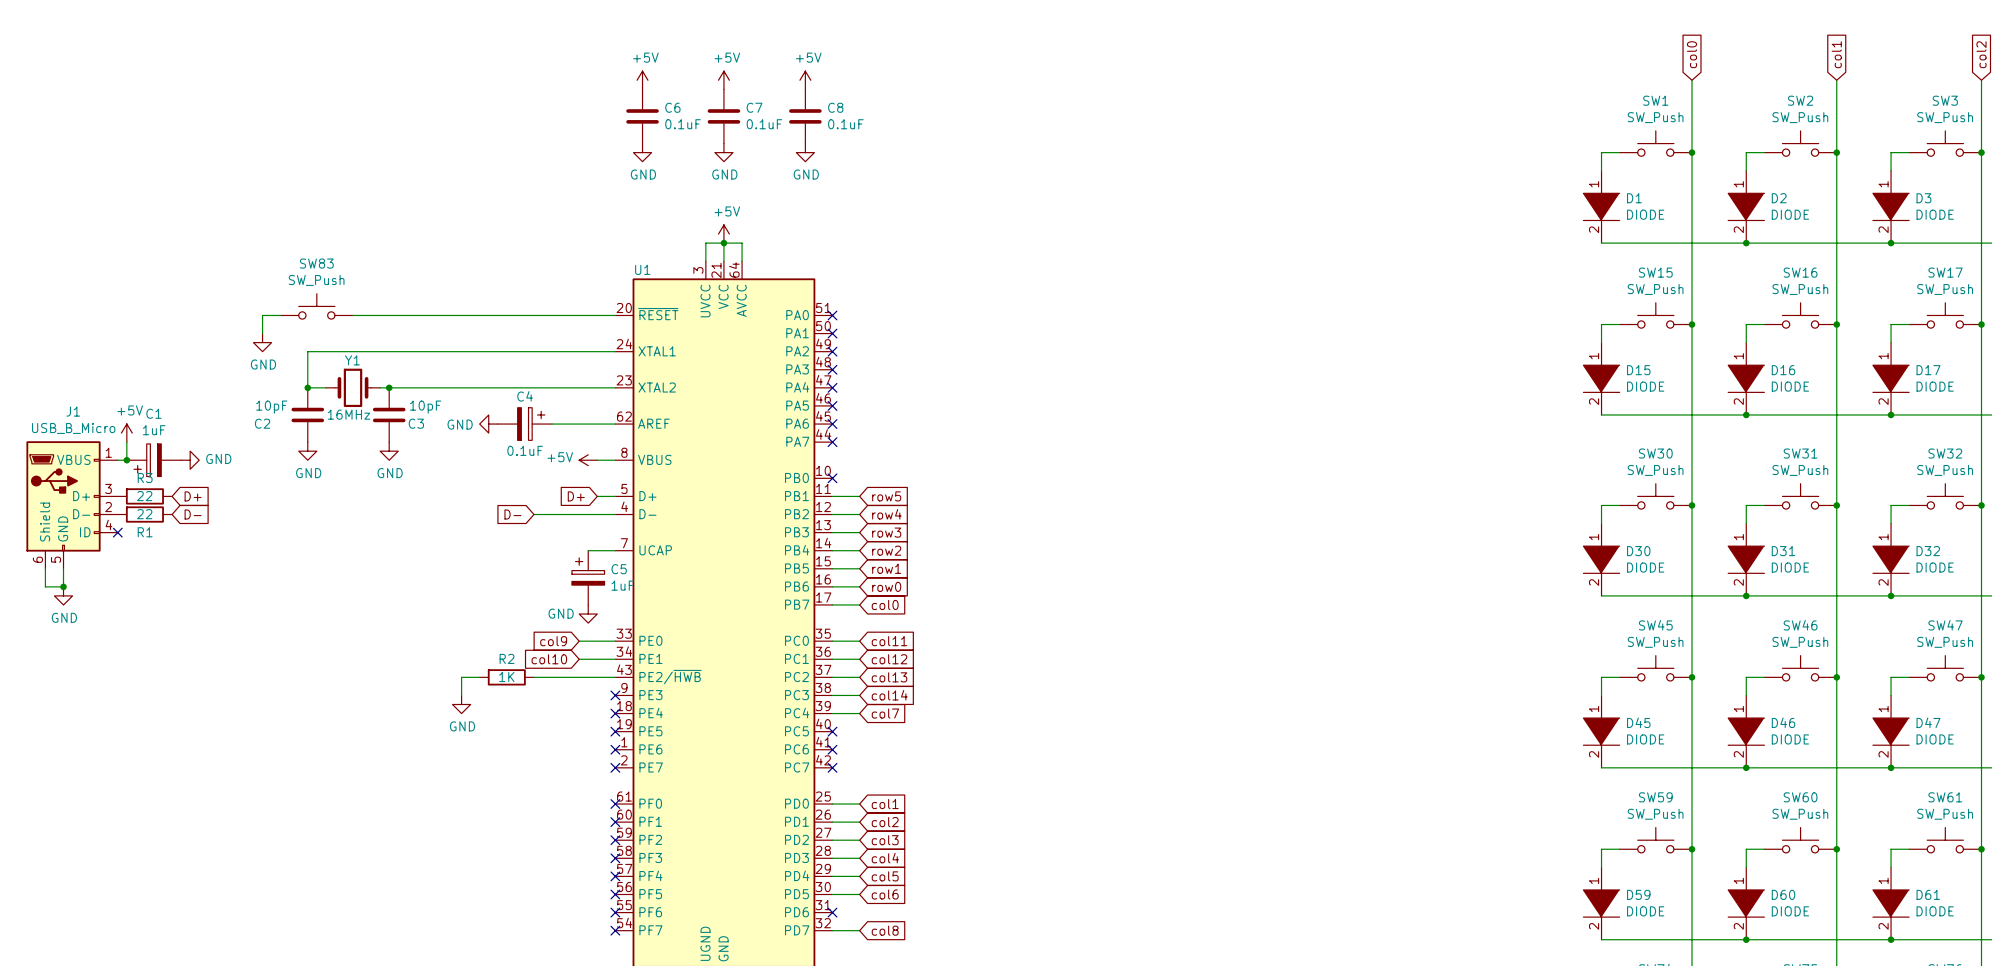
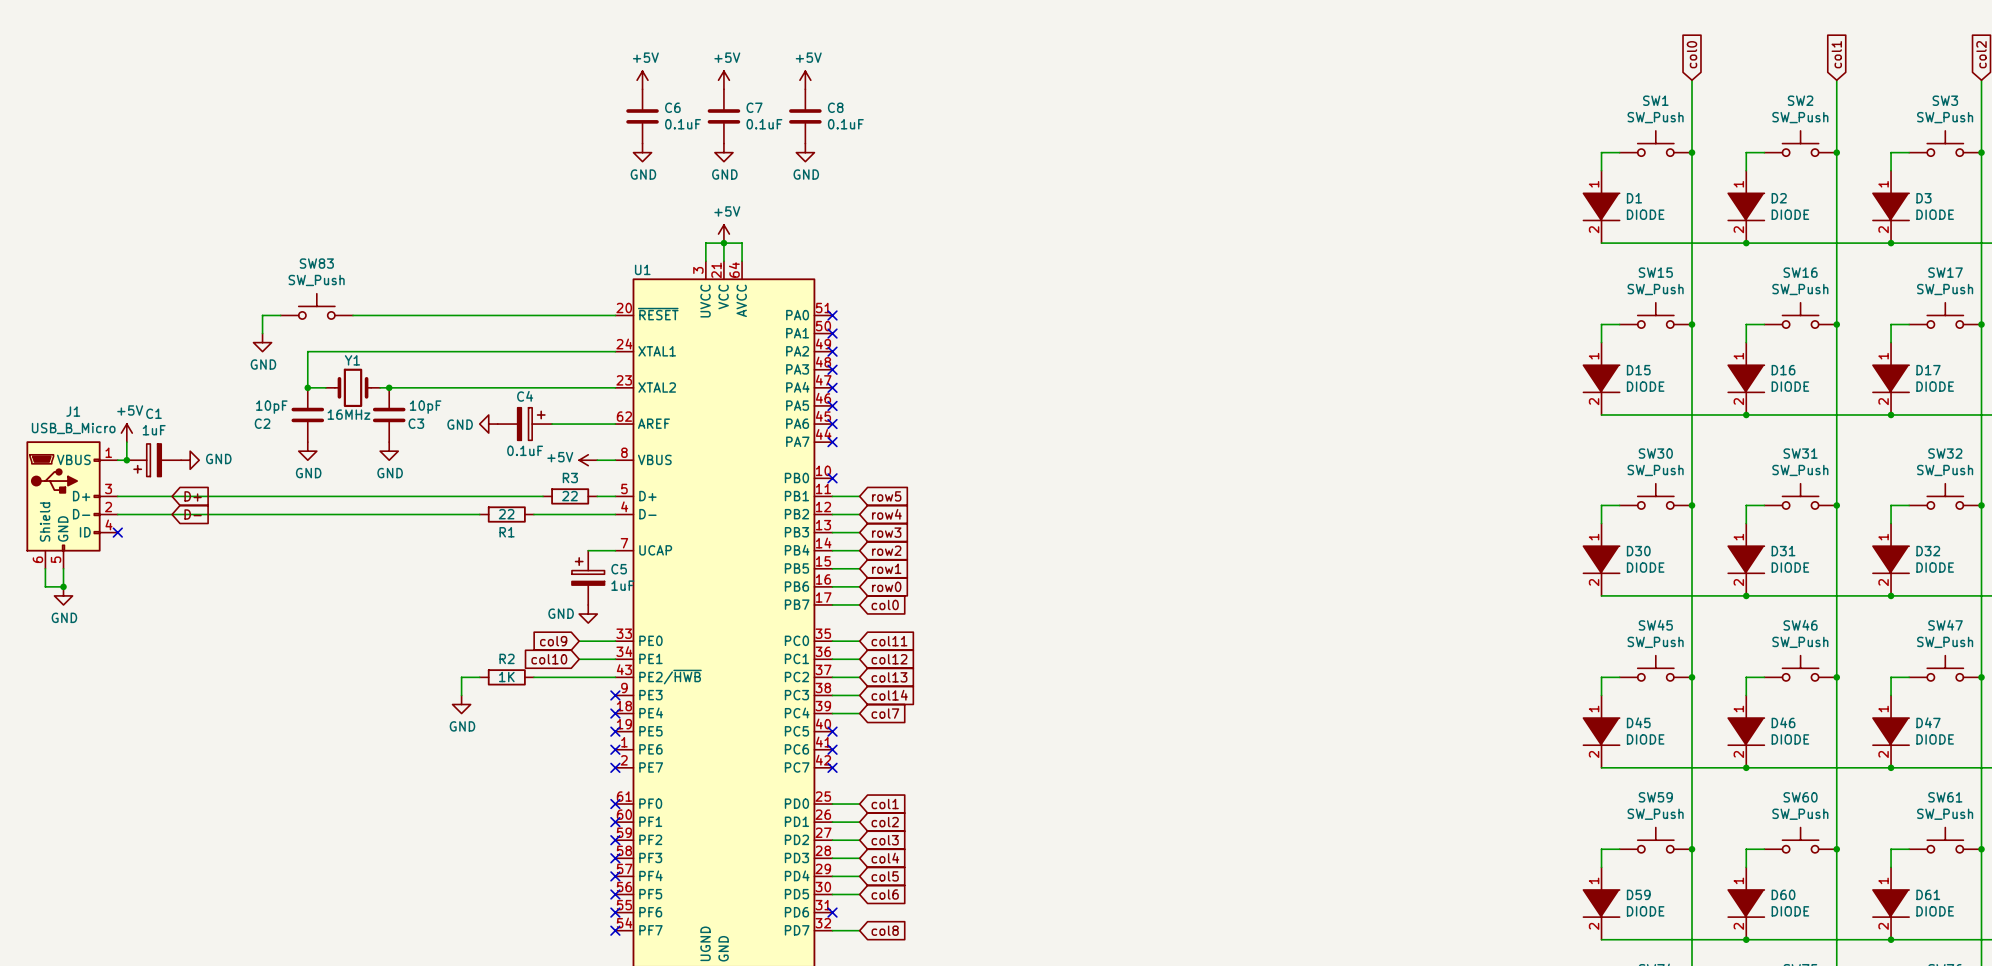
wire: none -> (117, 496) (543, 496)
R3 position: (144, 496) -> (570, 496)
global label: D+ (576, 496) -> none
wire: none -> (117, 514) (479, 514)
R1 position: (144, 514) -> (506, 514)
global label: D- (512, 514) -> none

